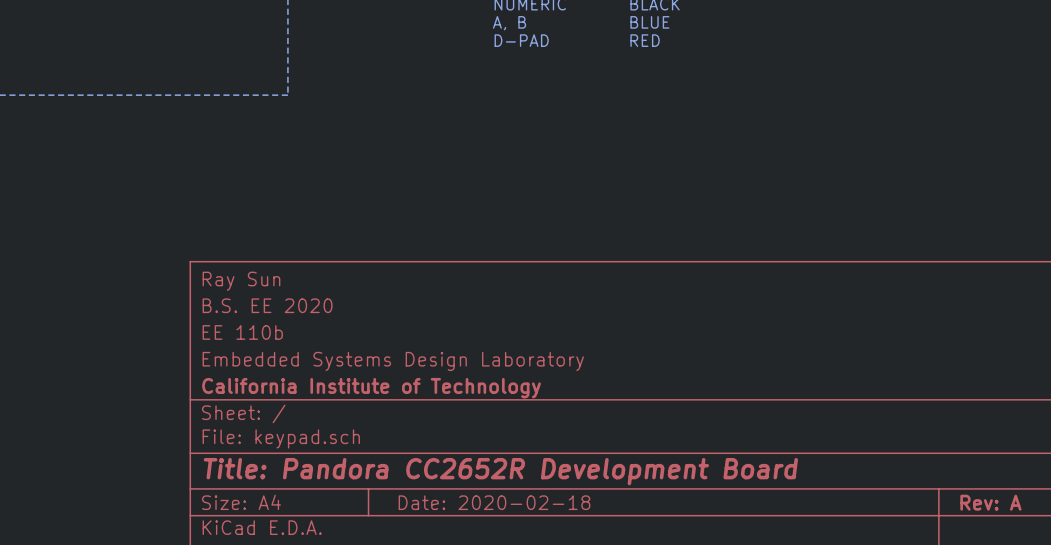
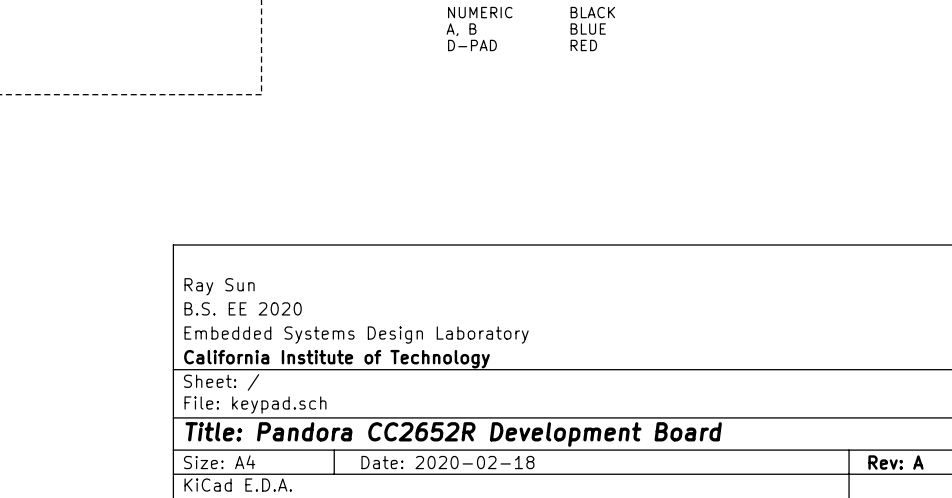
title block: Ray Sun (241, 281) -> none
title block: B.S. EE 2020 (267, 305) -> Ray Sun (219, 286)
title block: EE 110b (242, 332) -> B.S. EE 2020 (243, 308)

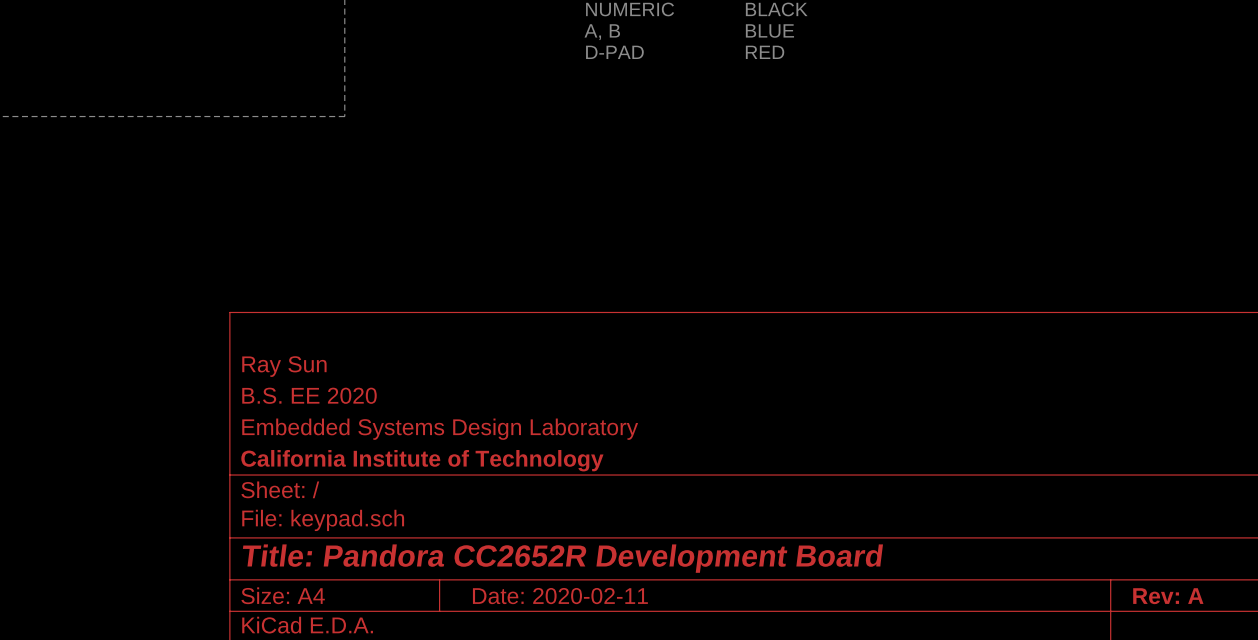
title block: Date: 2020-02-18 (447, 462) -> Date: 2020-02-11 (560, 596)

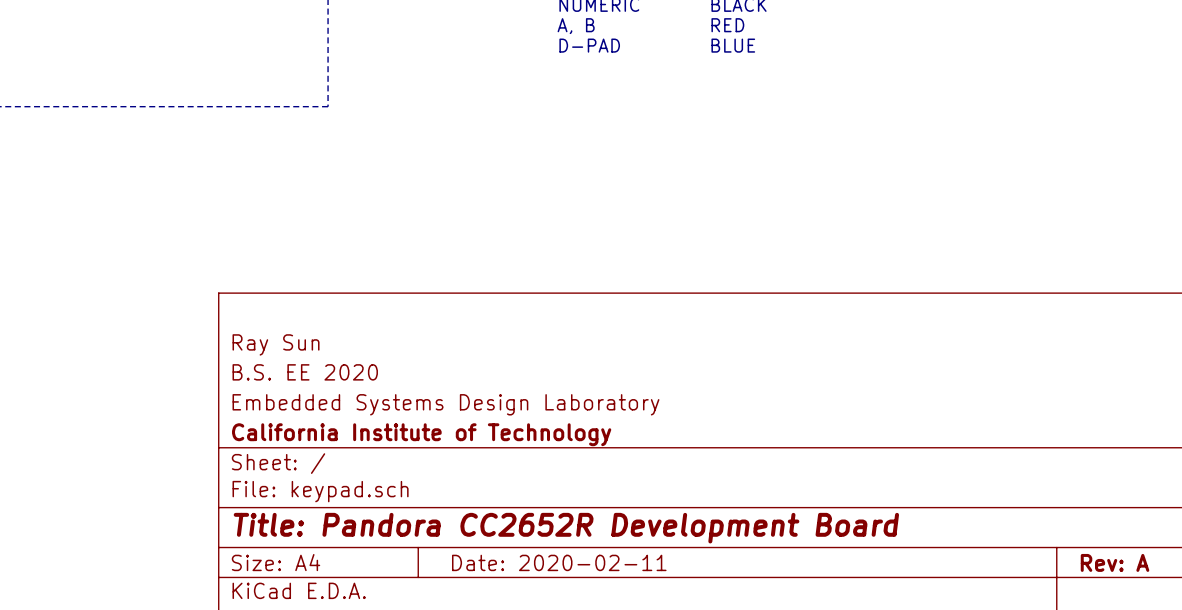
text: BLUE (769, 31) -> RED (727, 25)
text: RED (765, 52) -> BLUE (733, 45)

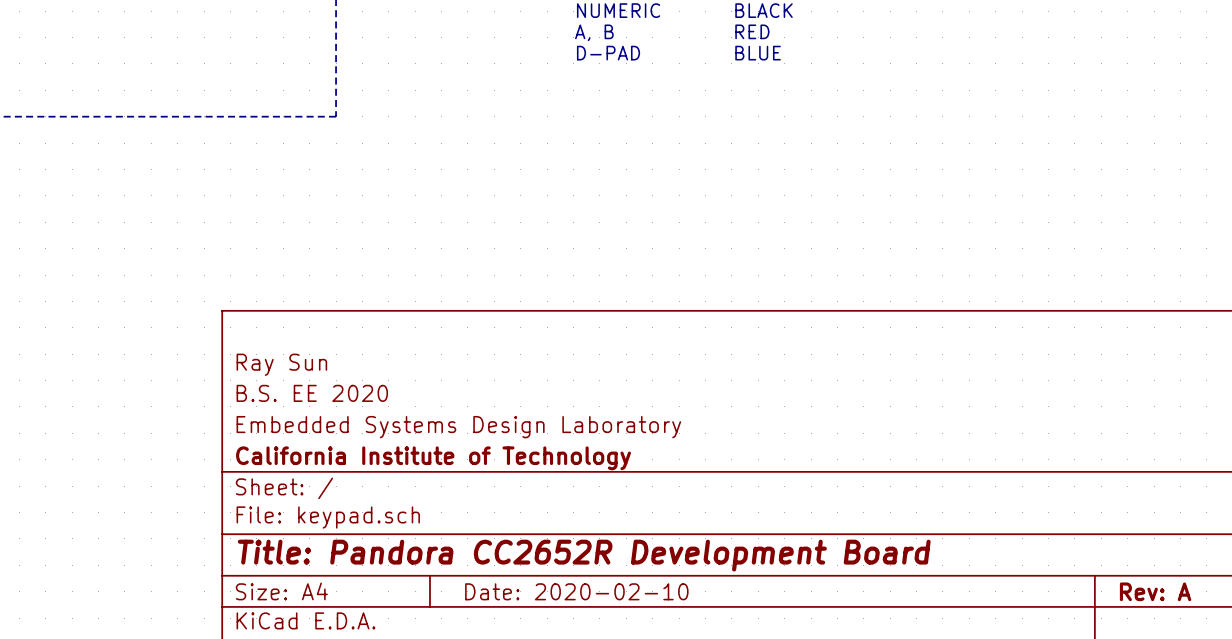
title block: Date: 2020-02-11 (559, 562) -> Date: 2020-02-10 (576, 591)

